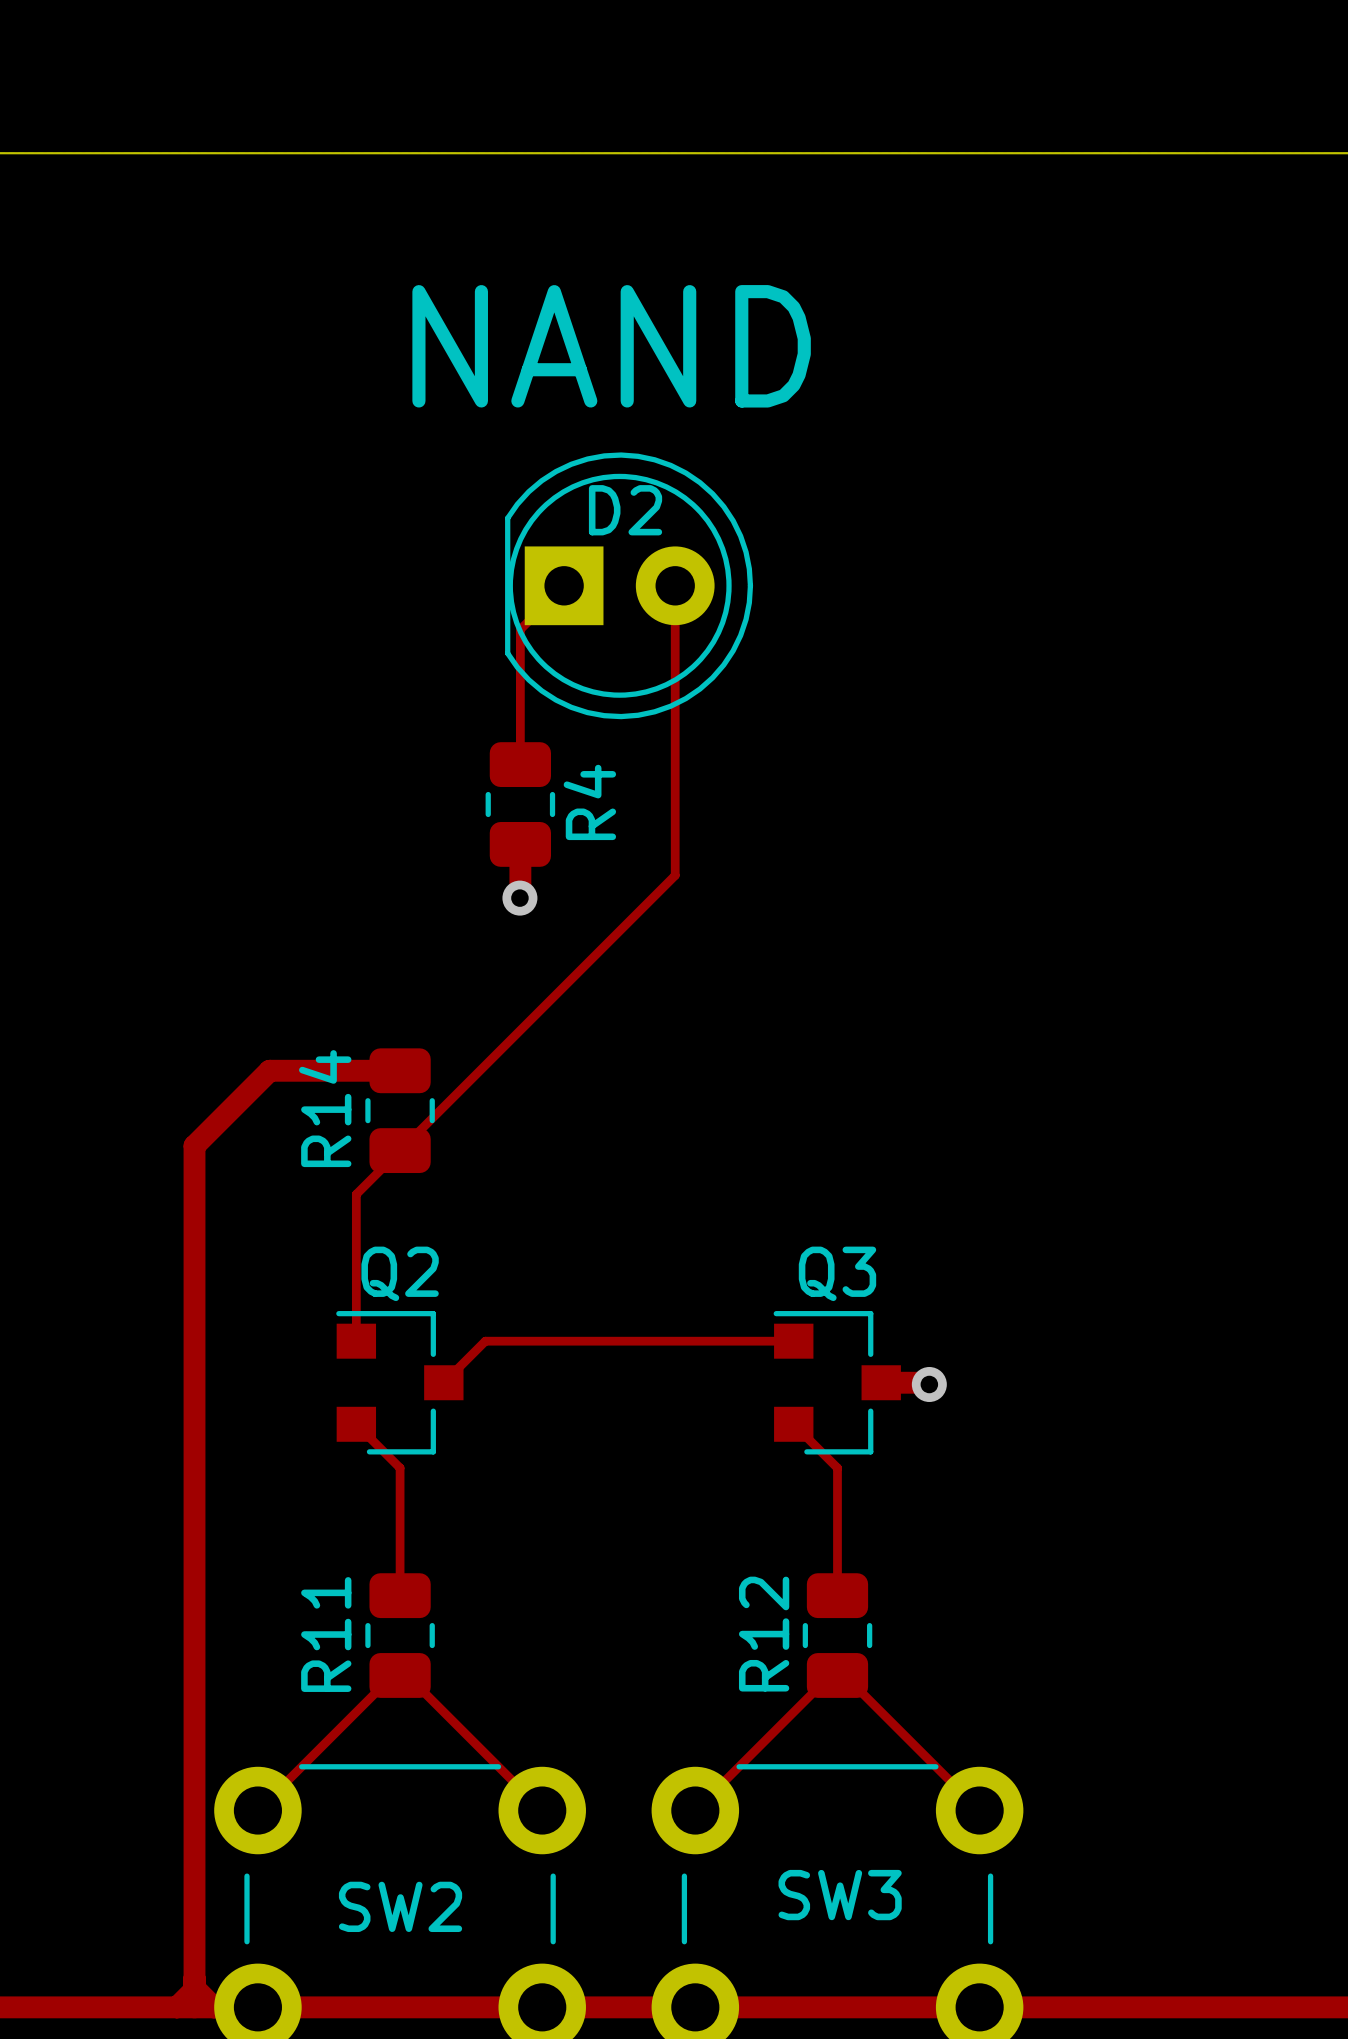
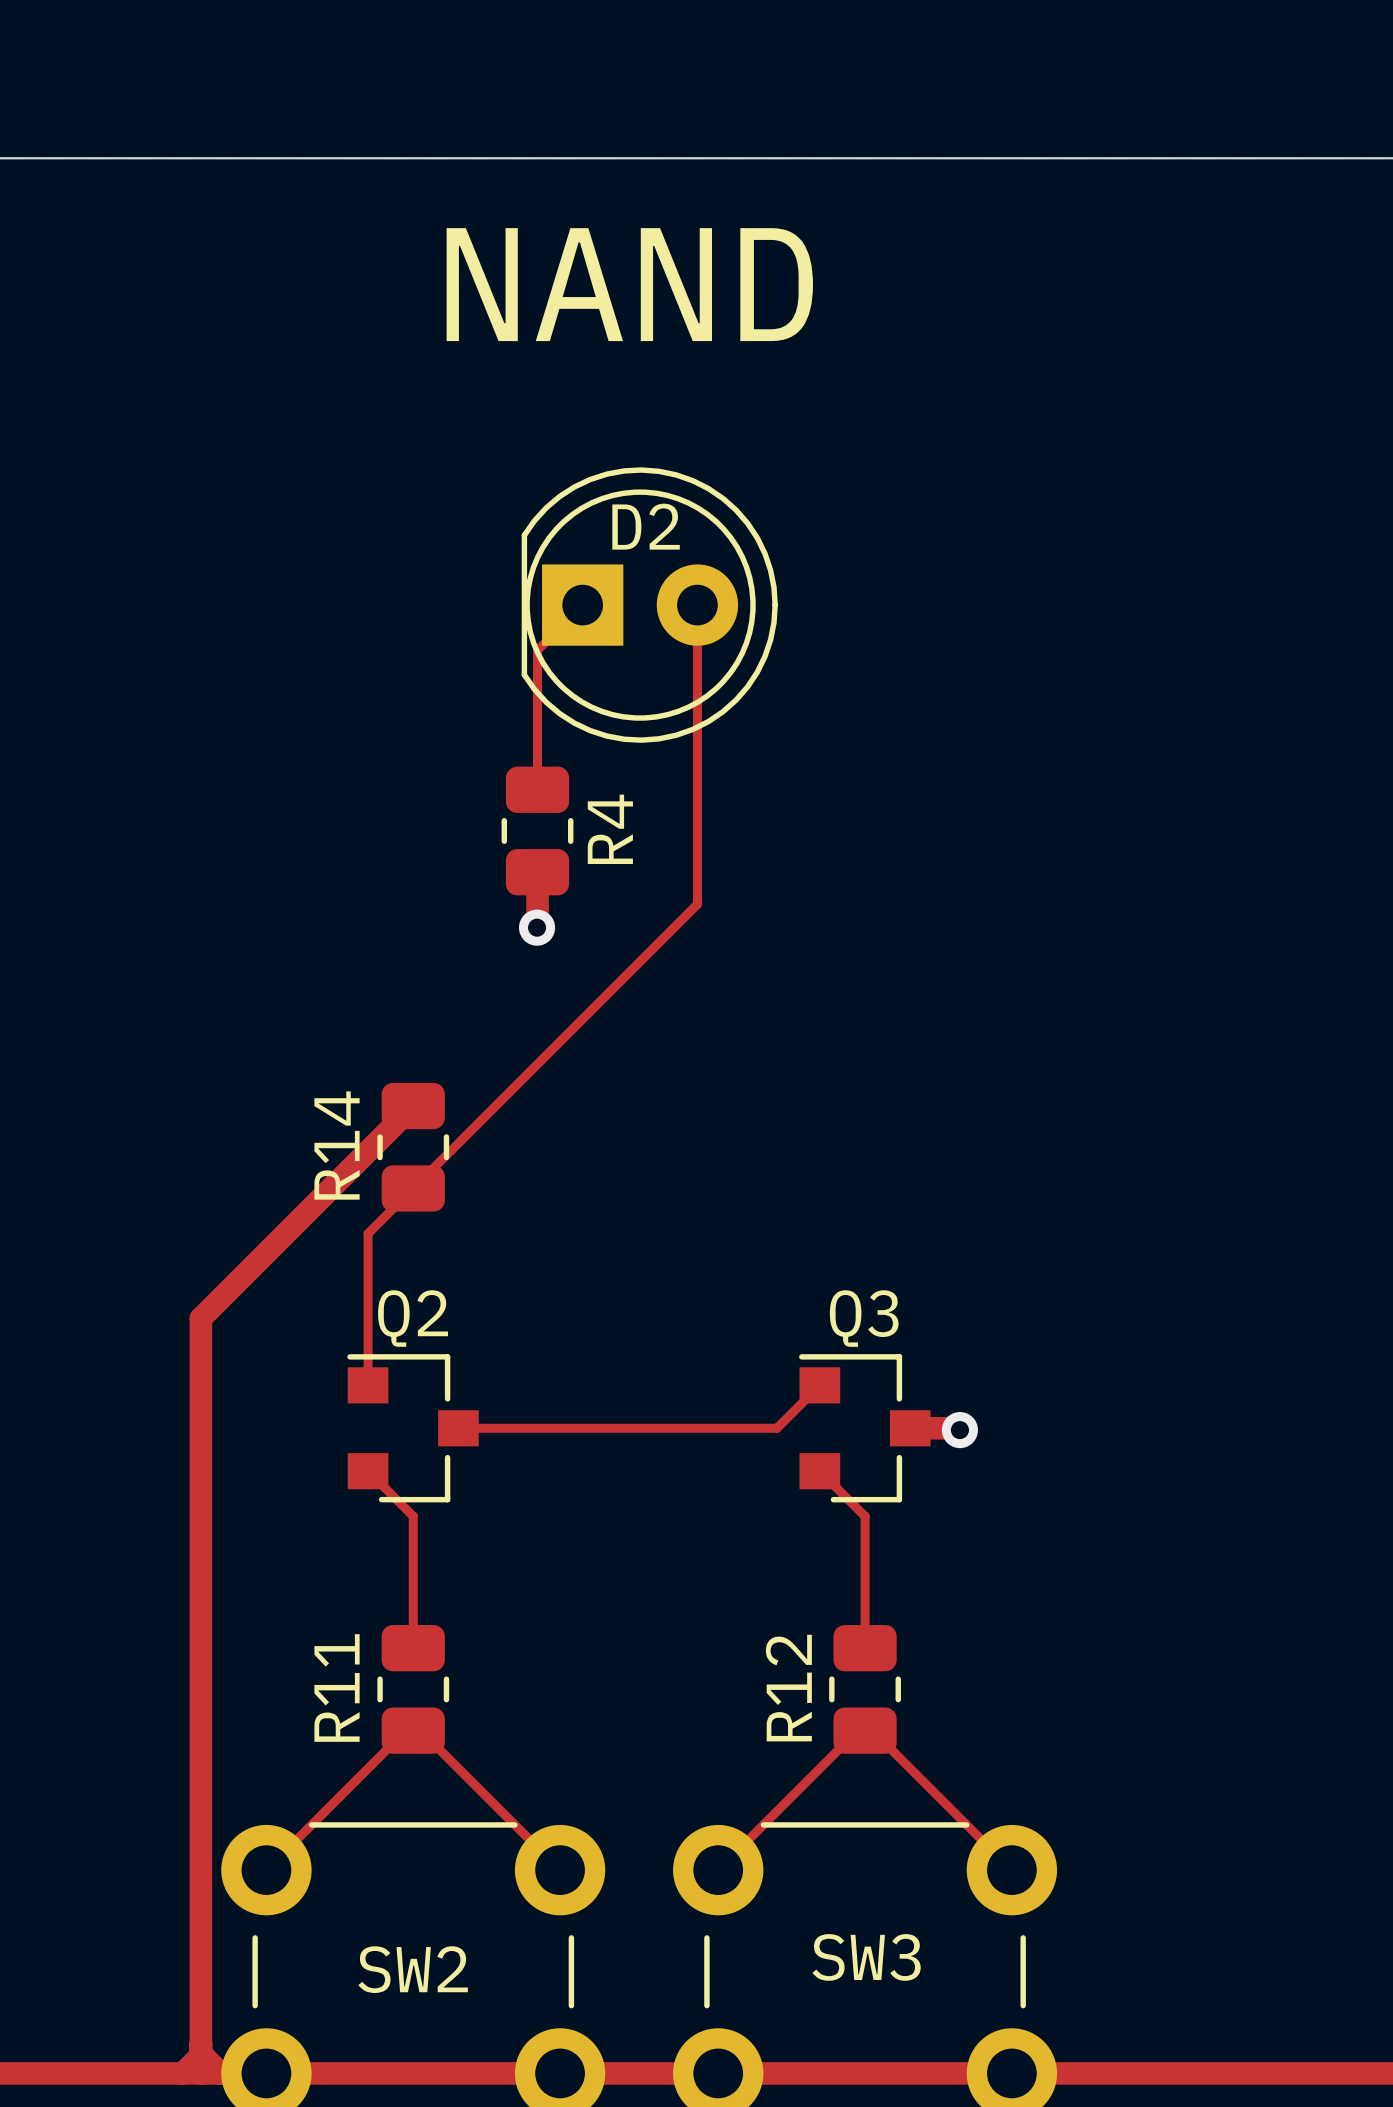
text position: NAND (611, 346) -> NAND (629, 284)
top track: (400, 1070) (269, 1070) (194, 1145) (194, 1276) -> (413, 1106) (200, 1318)
top track: (793, 1341) (485, 1341) (443, 1382) -> (819, 1385) (776, 1428) (458, 1428)

